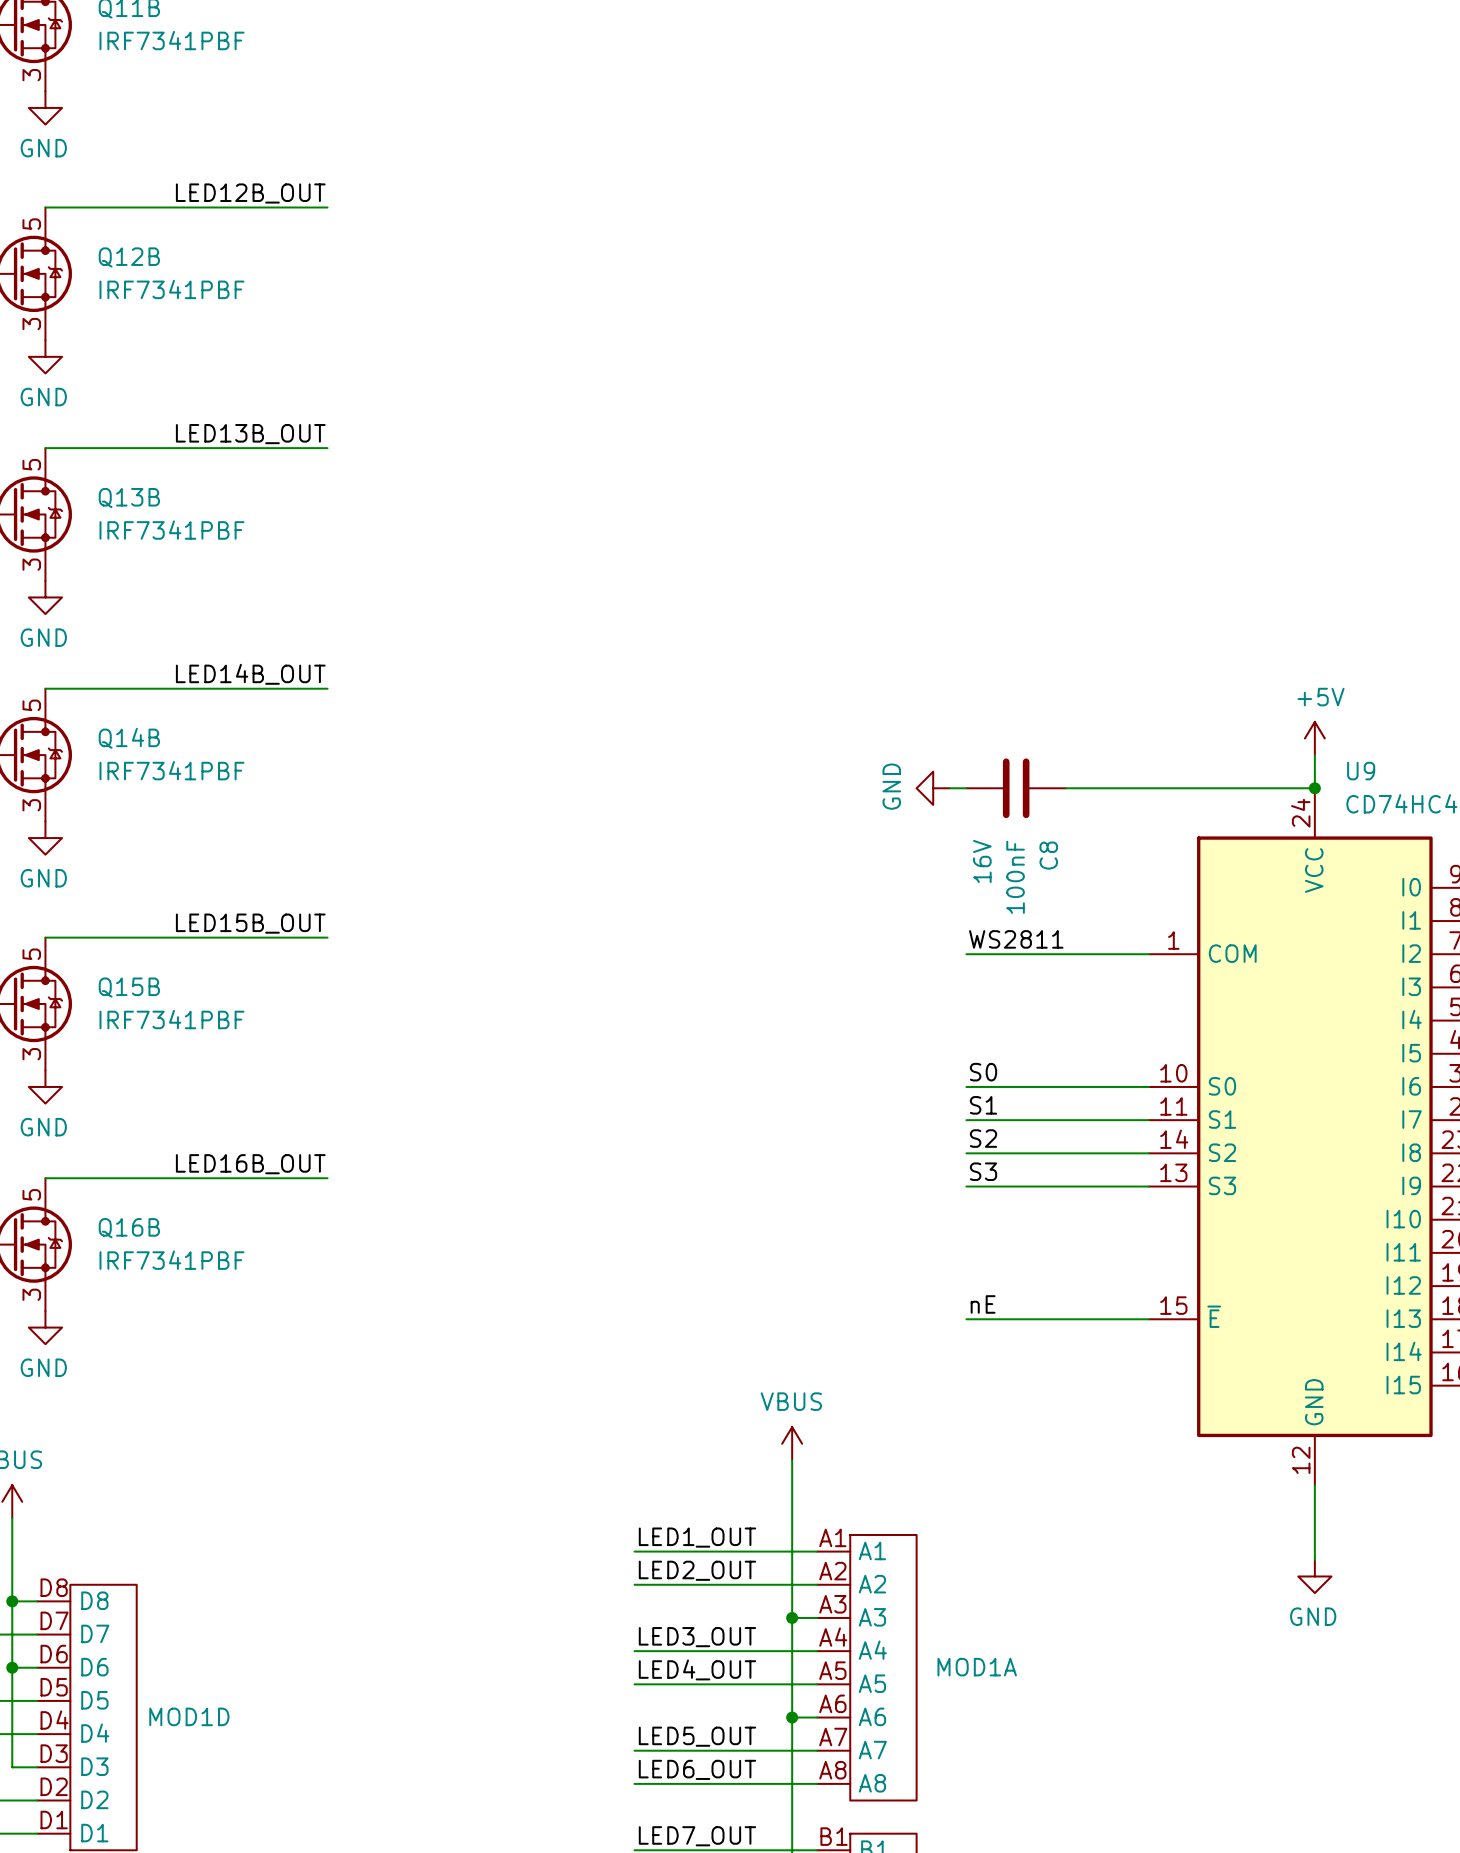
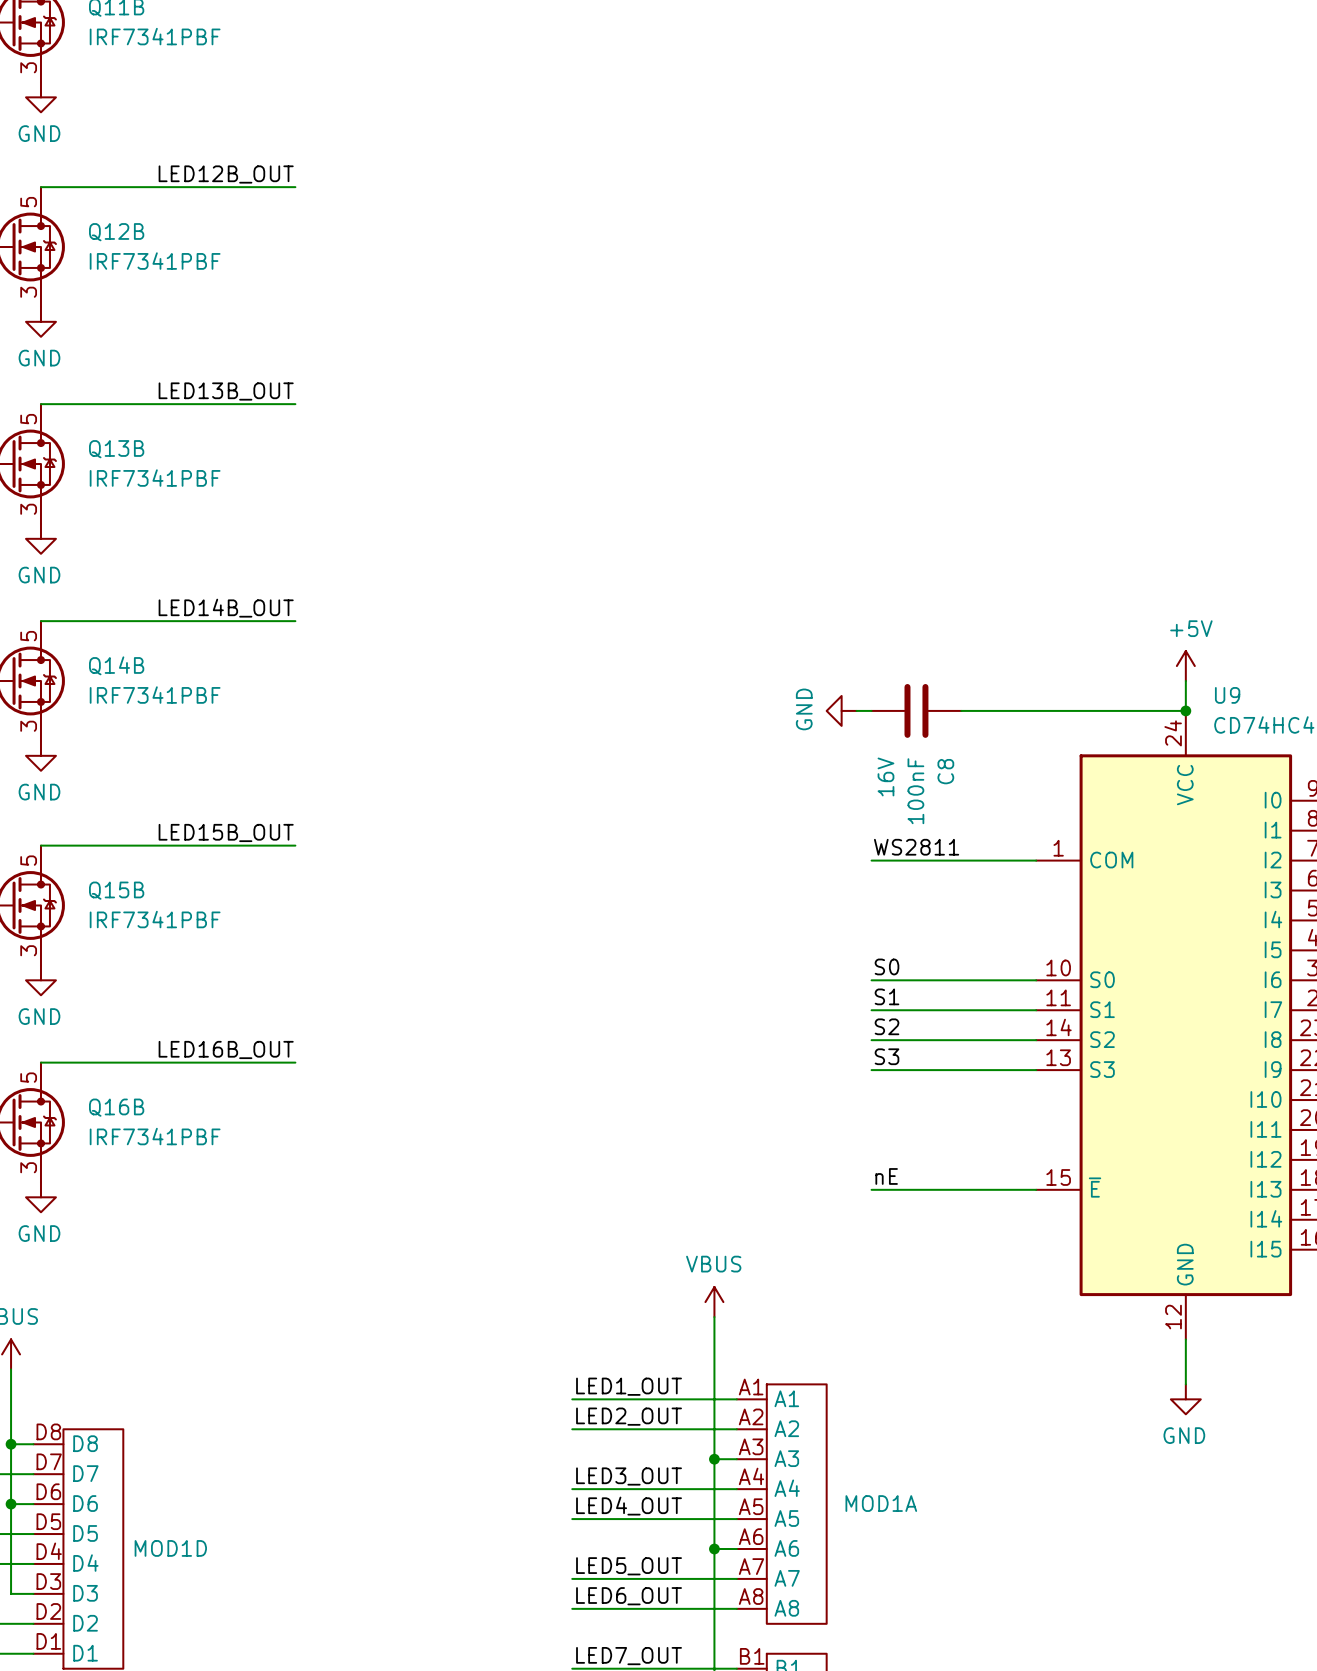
power symbol position: GND (1314, 1576) -> GND (1185, 1399)

